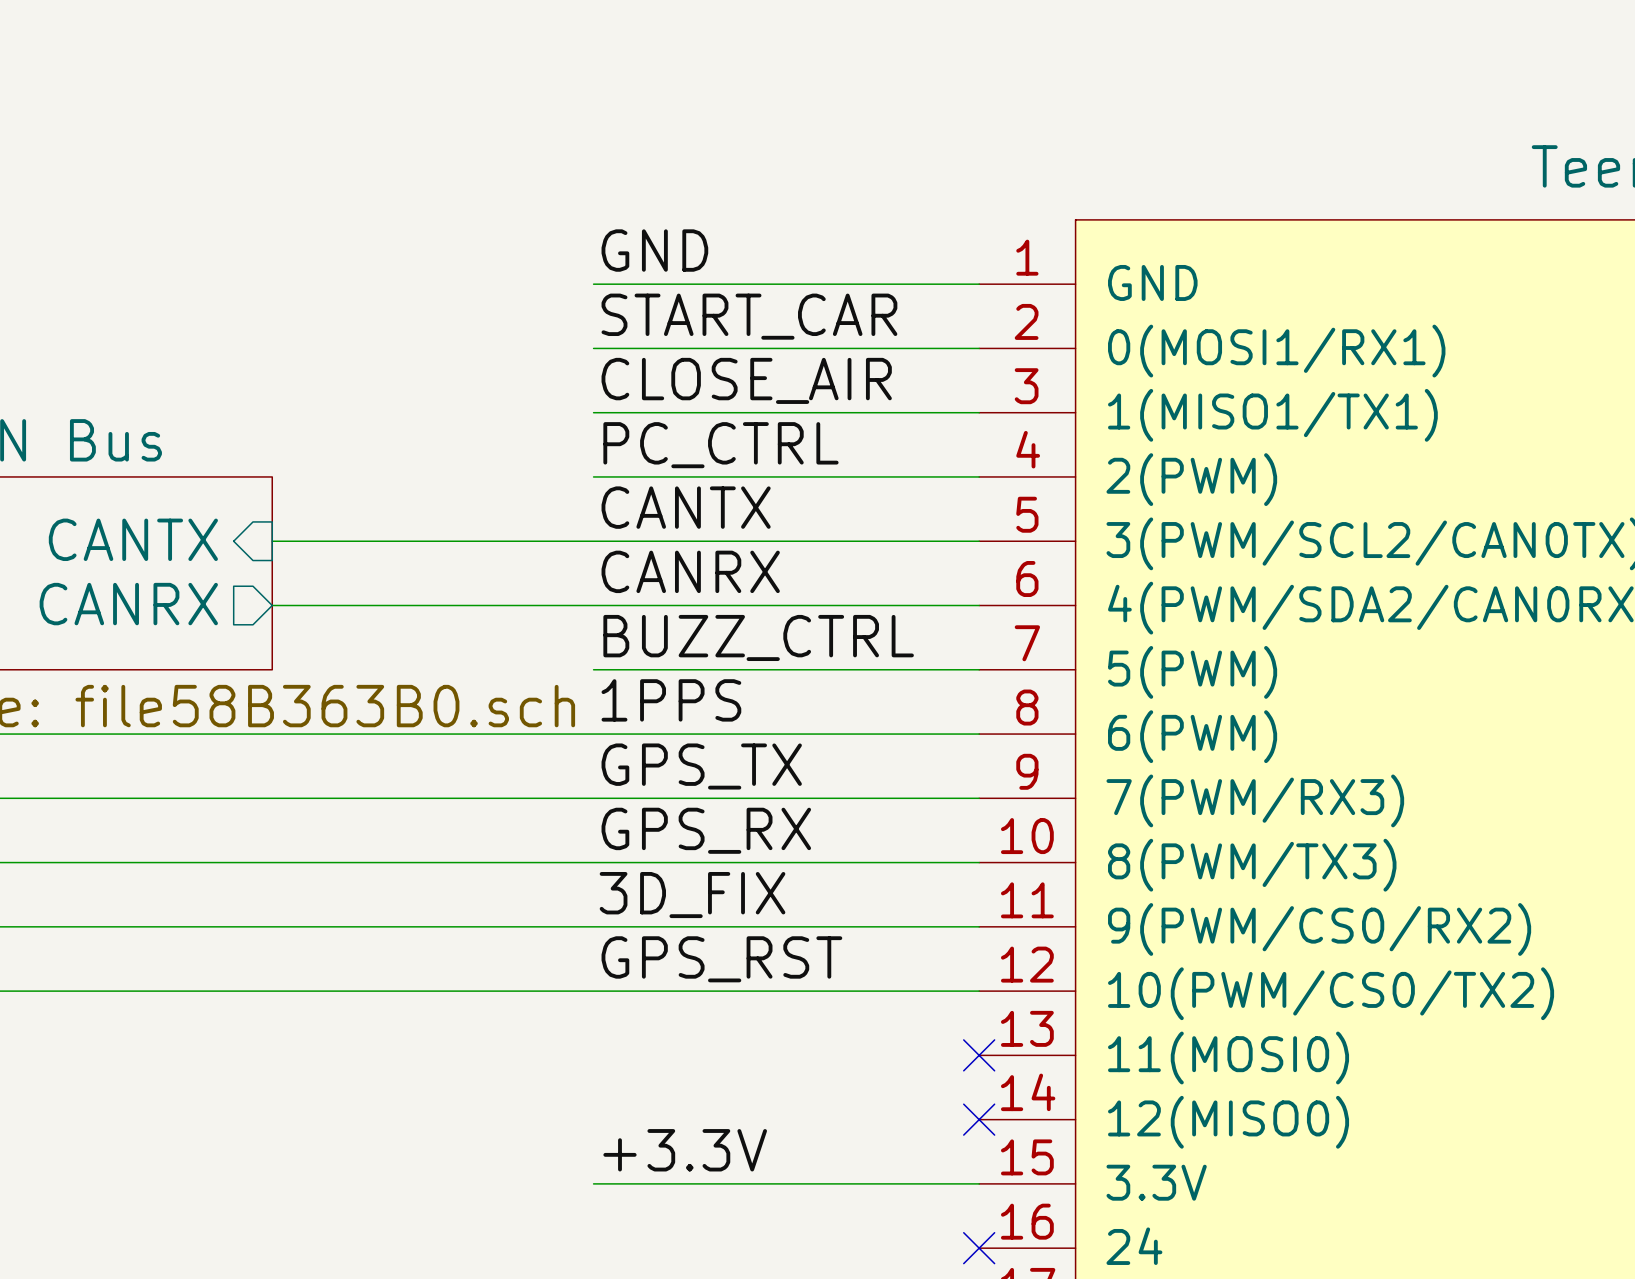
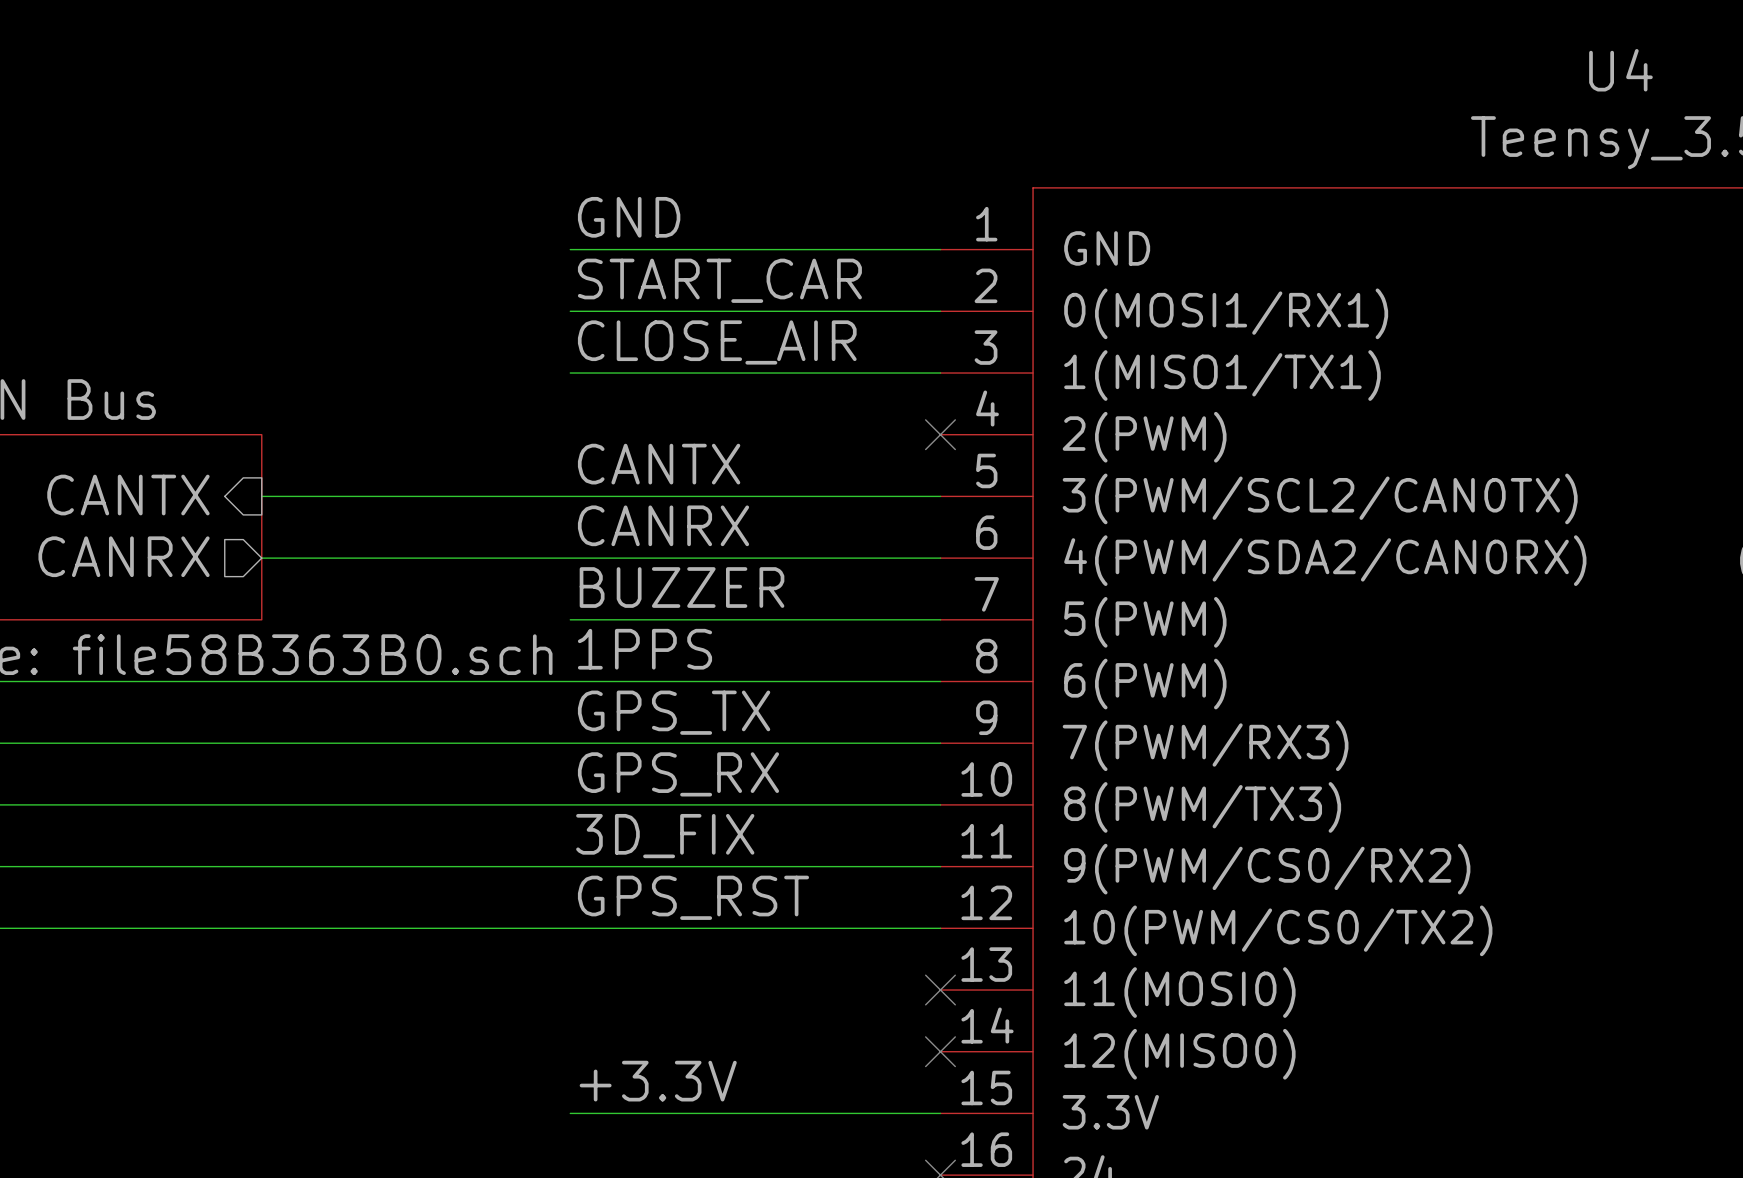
label: PC_CTRL (720, 445) -> none
wire: (593, 476) (979, 476) -> none
no-connect mark: none -> (940, 434)
label: BUZZ_CTRL (758, 637) -> BUZZER (682, 587)

